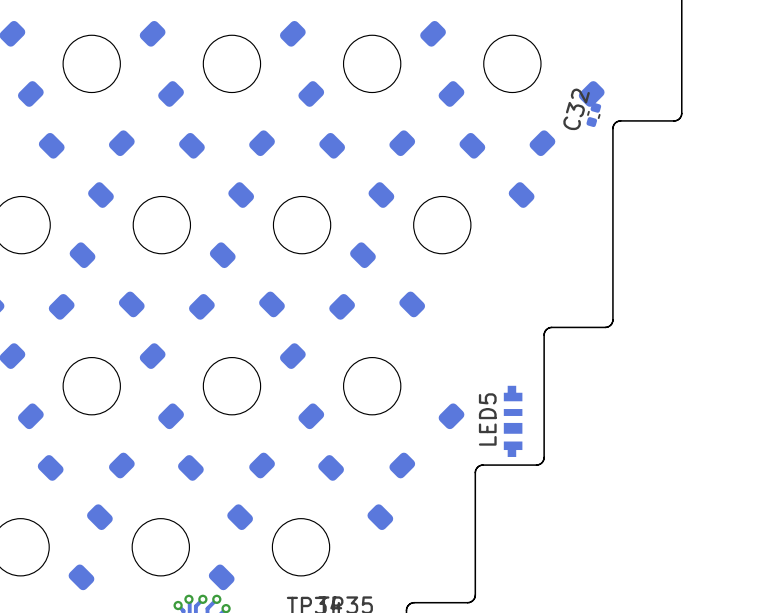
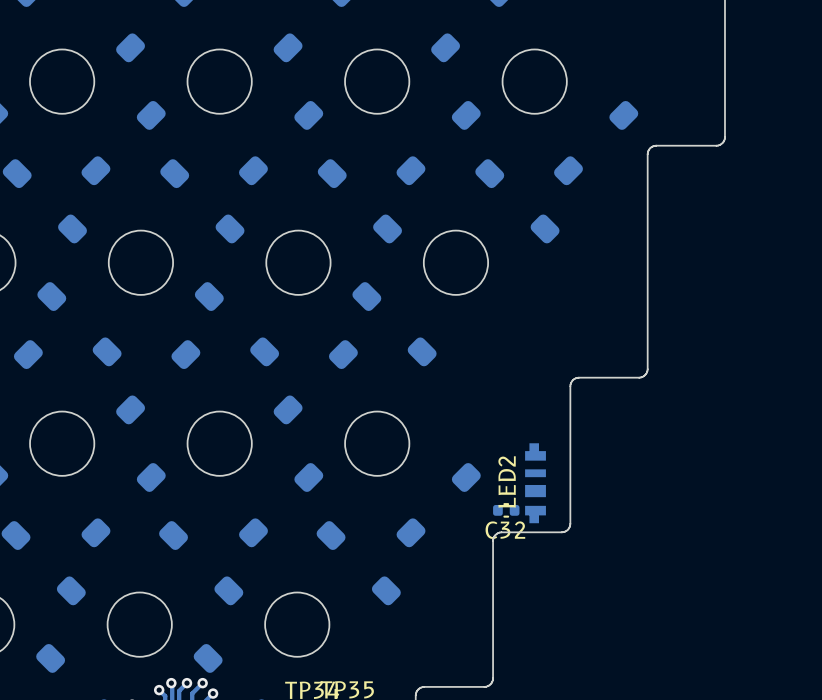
C32 rotation: 0° (593, 114) -> 74° clockwise (506, 510)
C32 position: (593, 114) -> (506, 510)
LED5 name: LED5 (487, 419) -> LED2 (507, 481)

